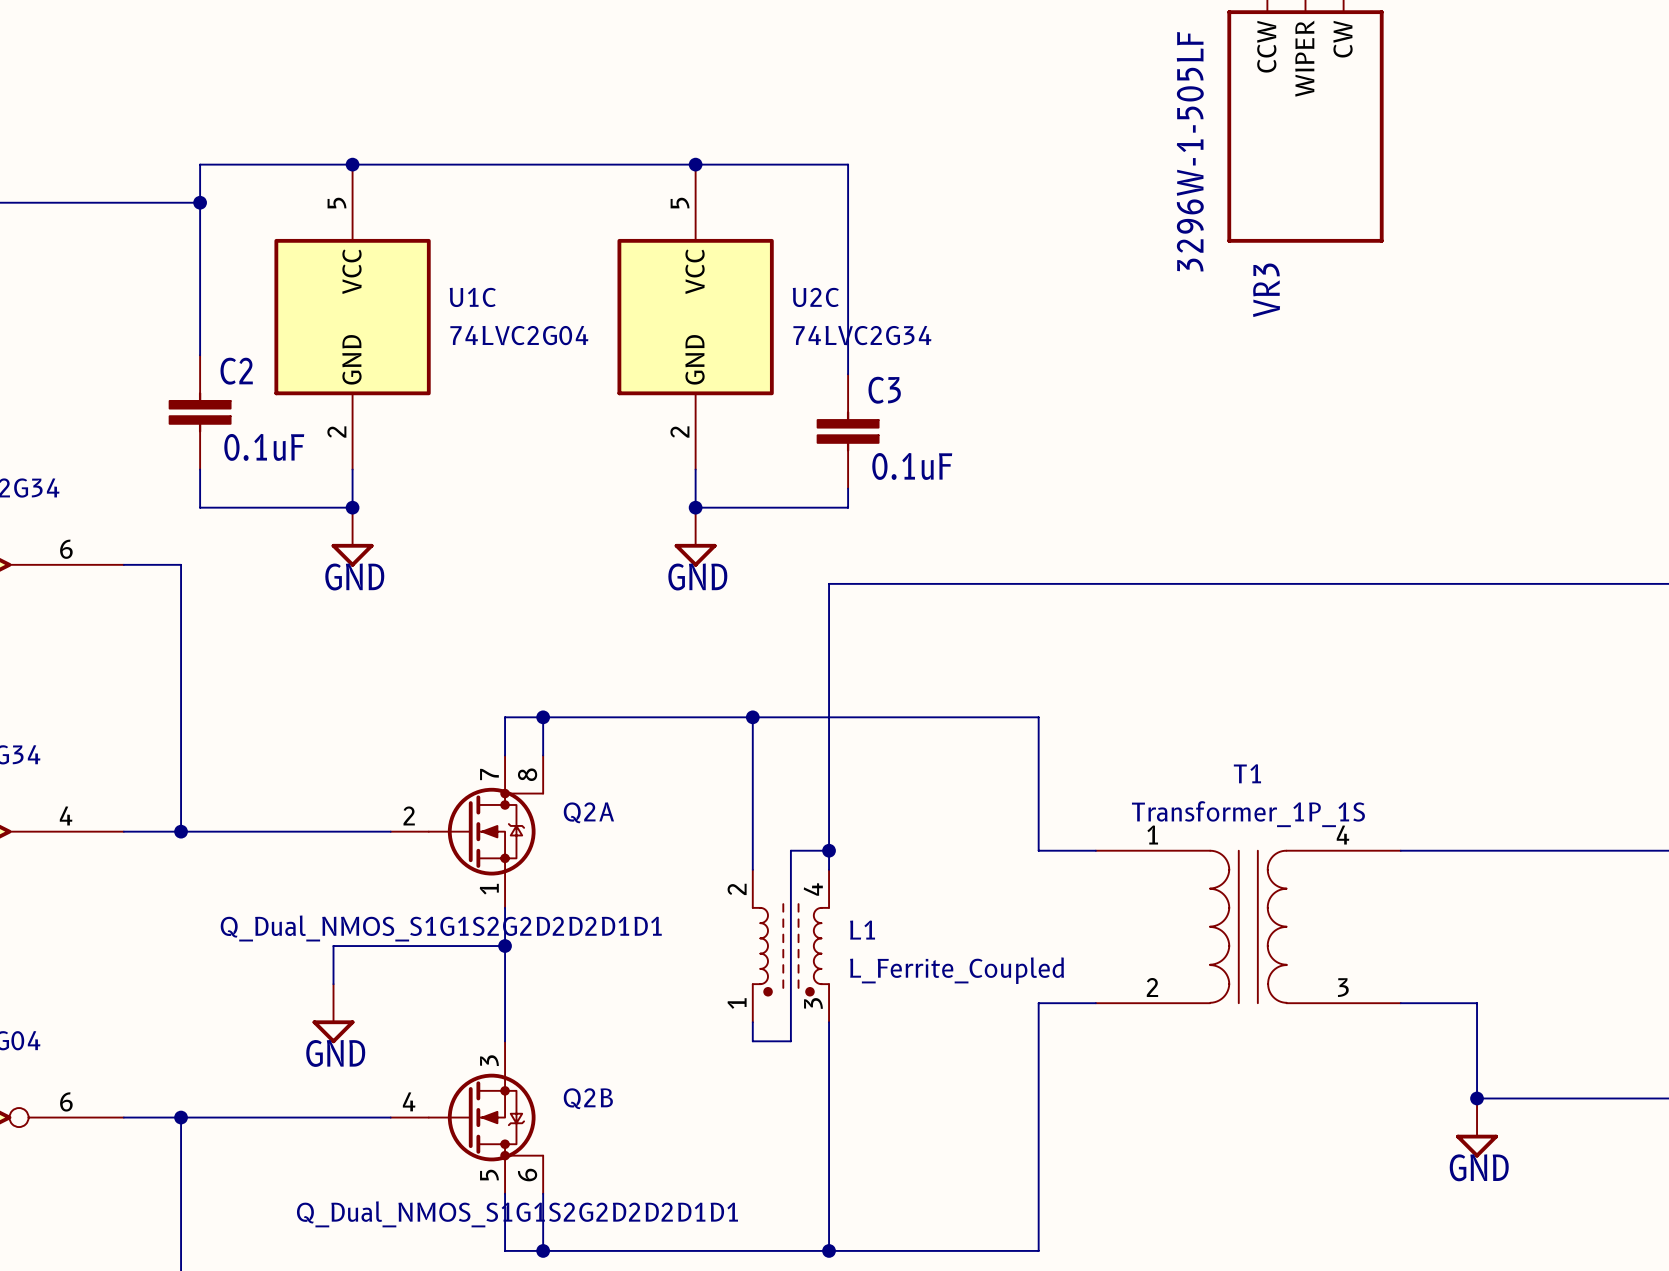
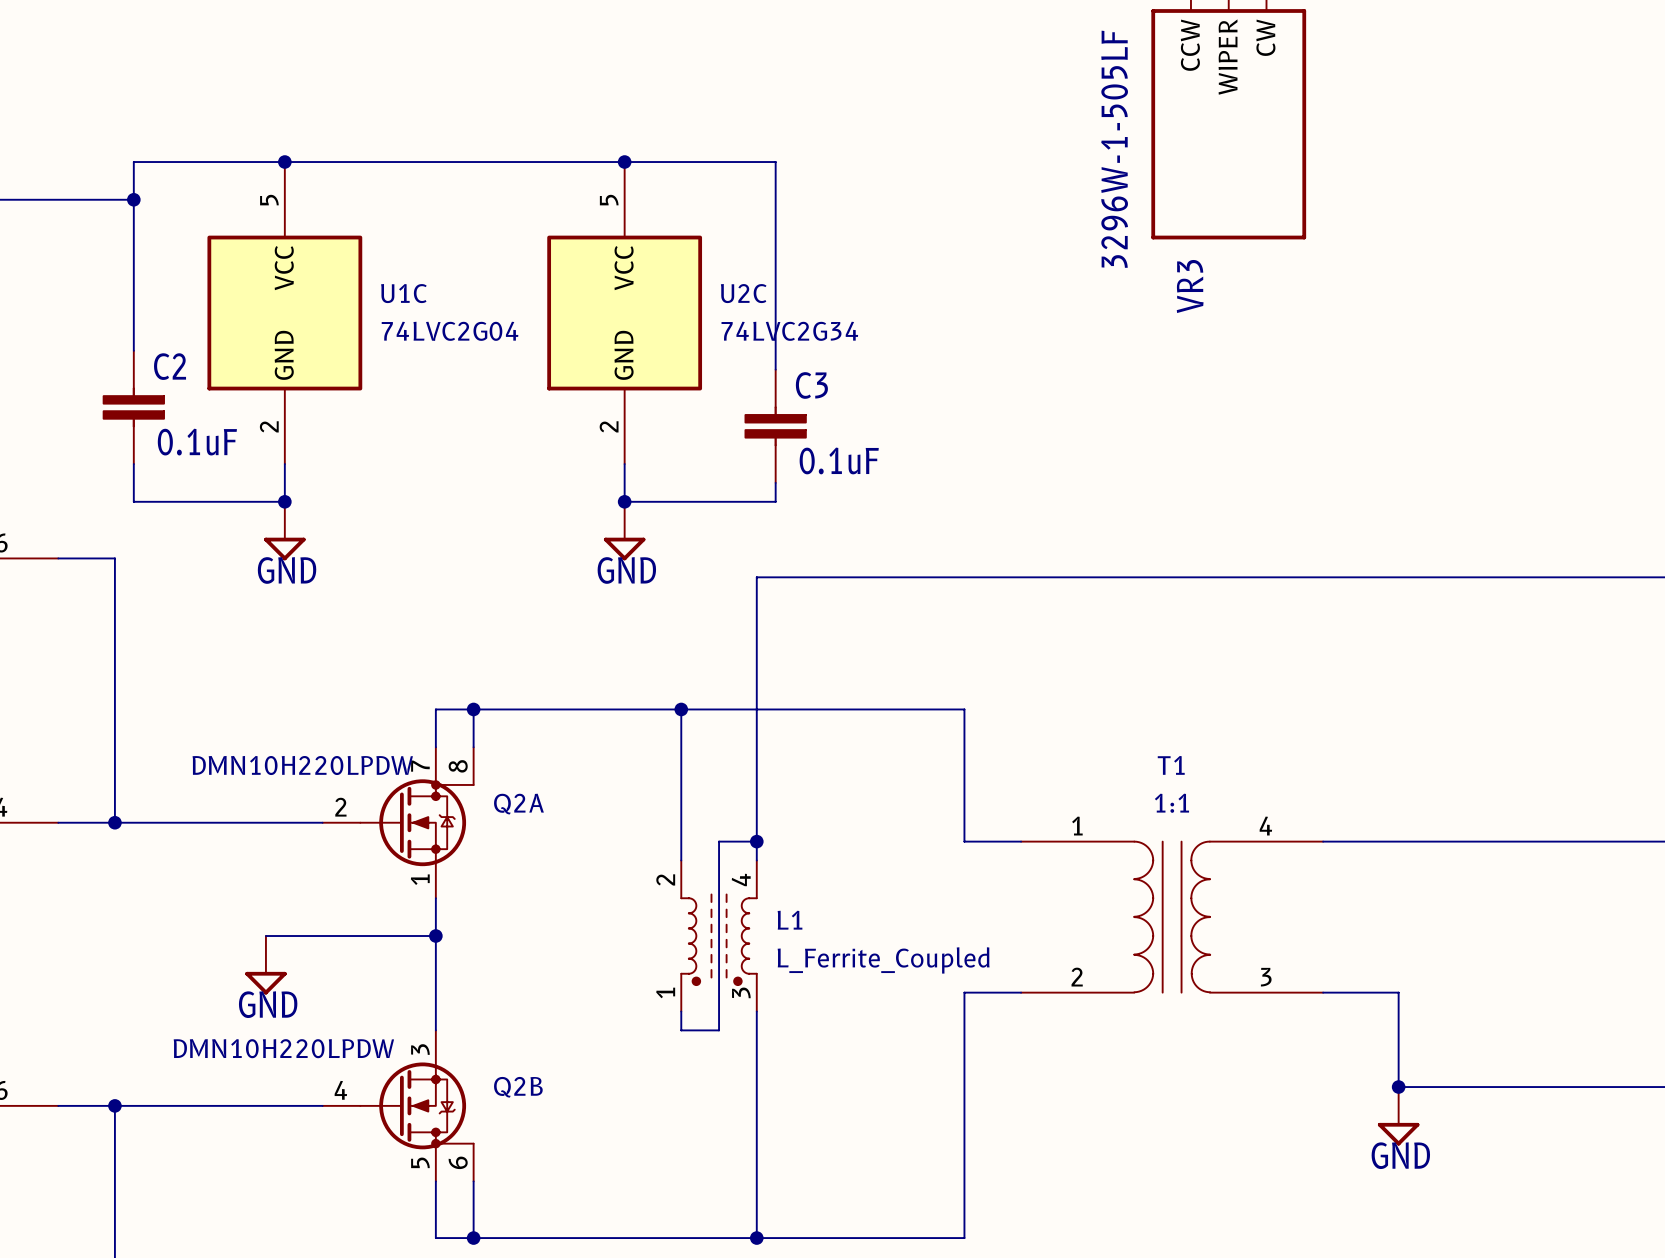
T1 value: Transformer_1P_1S (1248, 814) -> 1:1 (1171, 803)
Q2A value: Q_Dual_NMOS_S1G1S2G2D2D2D1D1 (441, 928) -> DMN10H220LPDW (302, 765)
power symbol position: GND (333, 1013) -> GND (265, 965)
Q2B value: Q_Dual_NMOS_S1G1S2G2D2D2D1D1 (517, 1214) -> DMN10H220LPDW (283, 1048)

